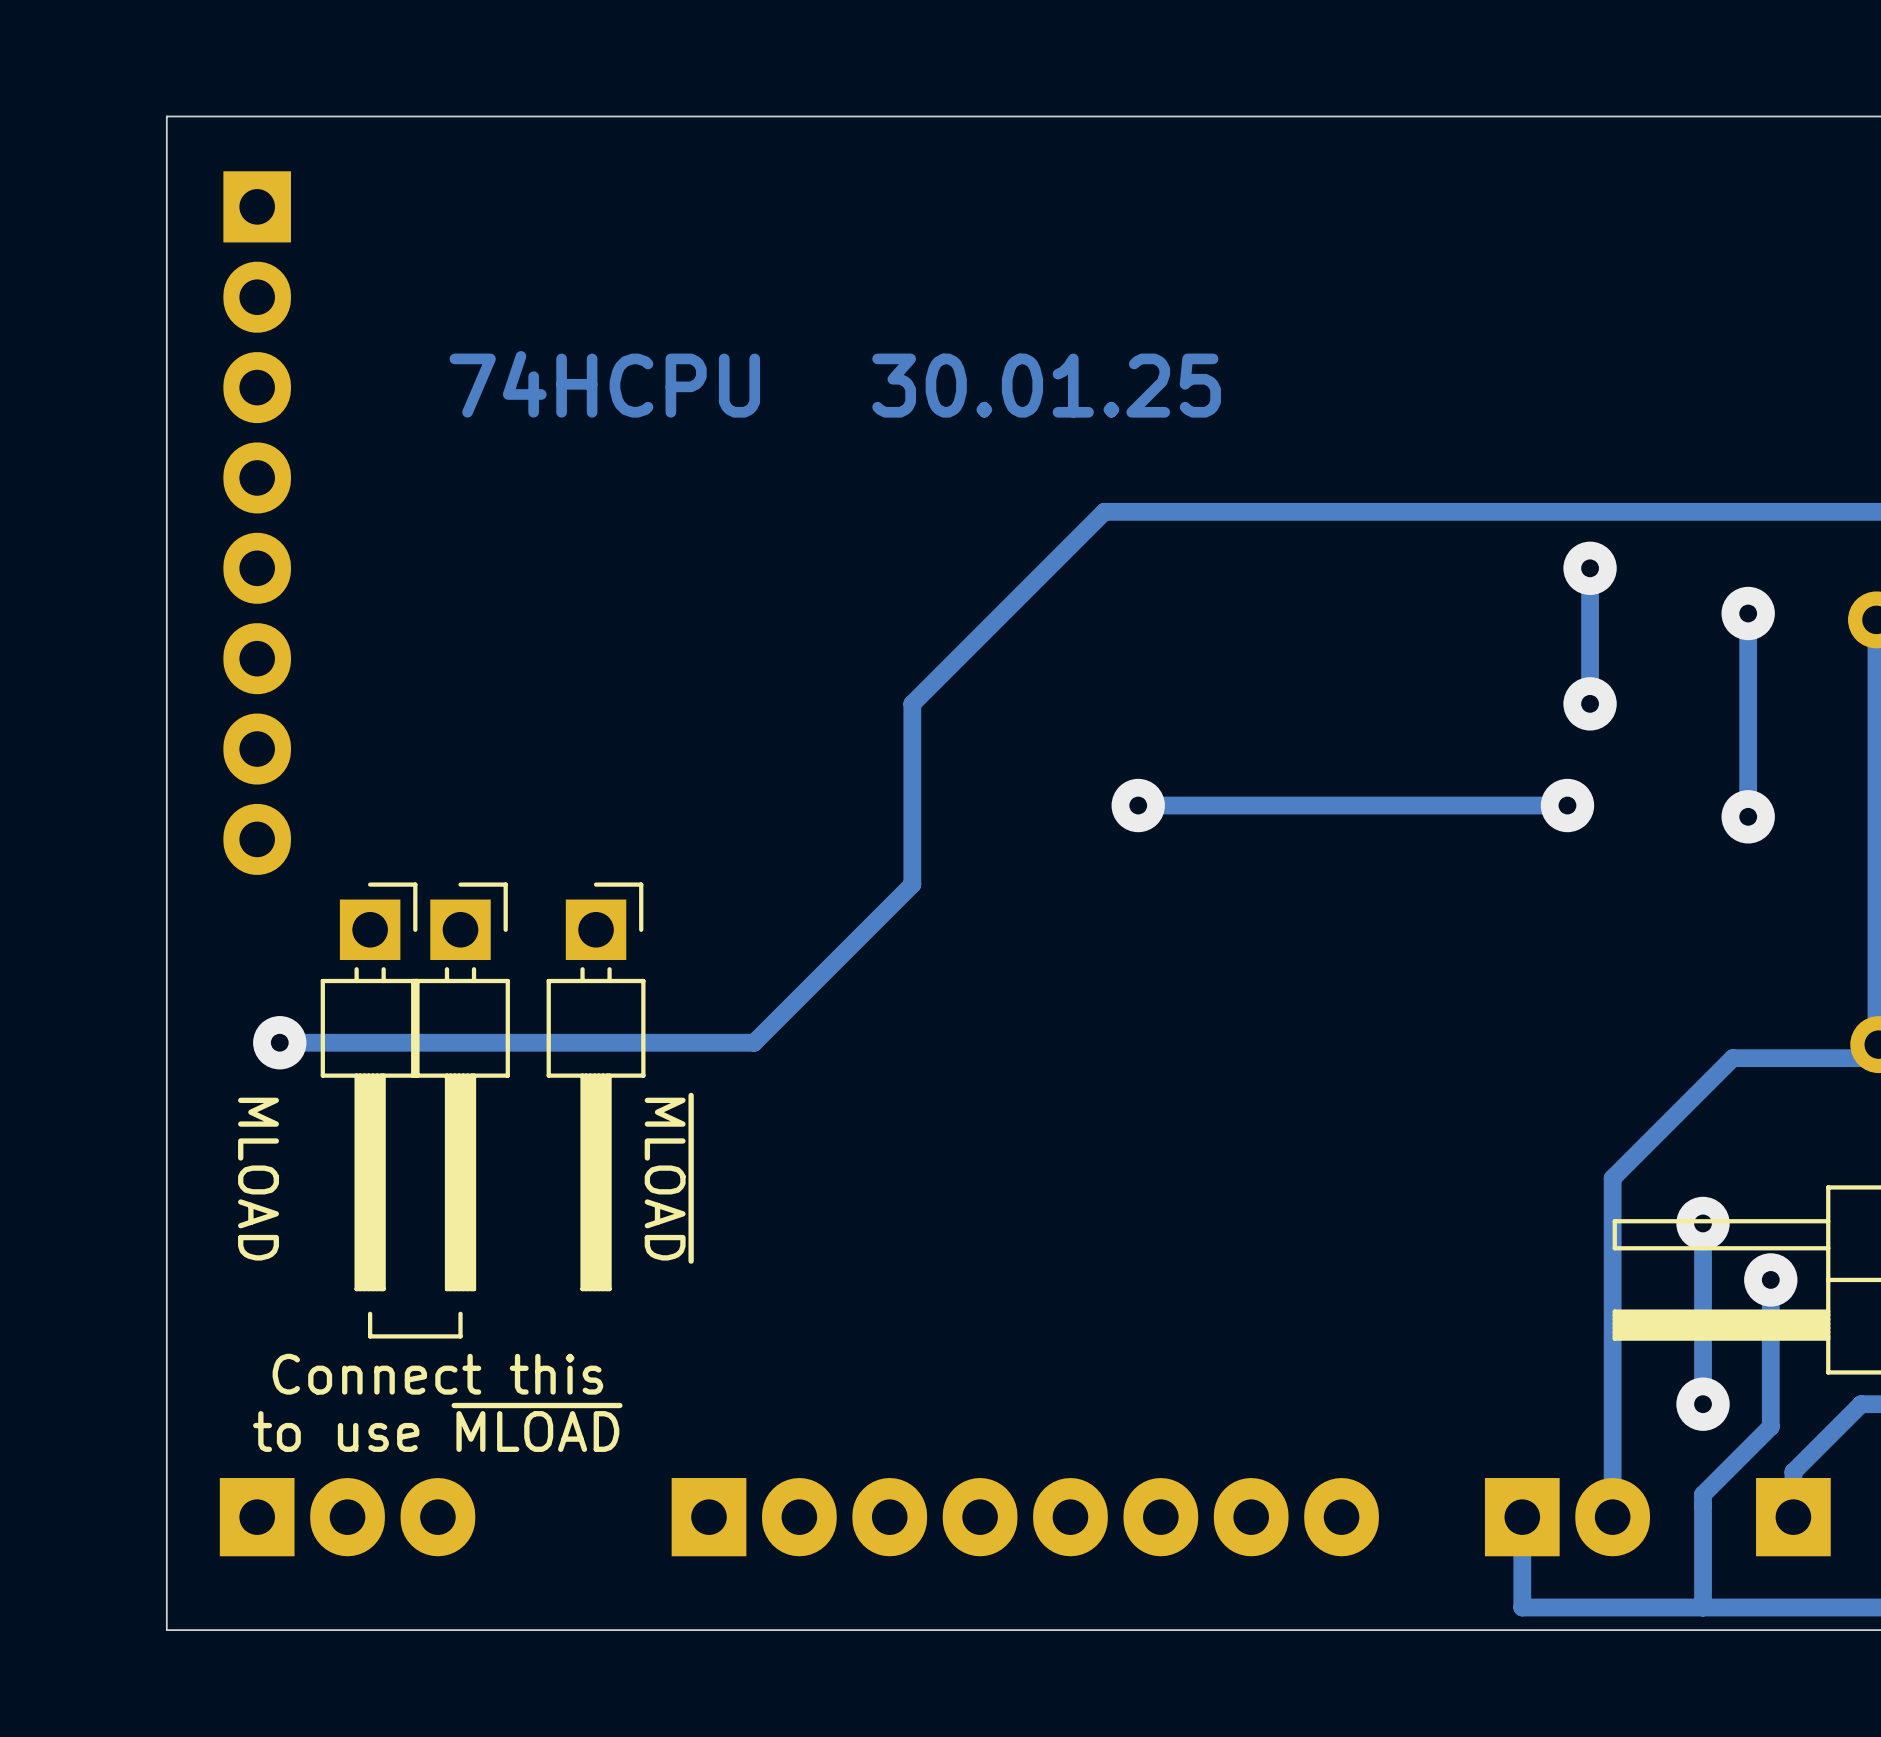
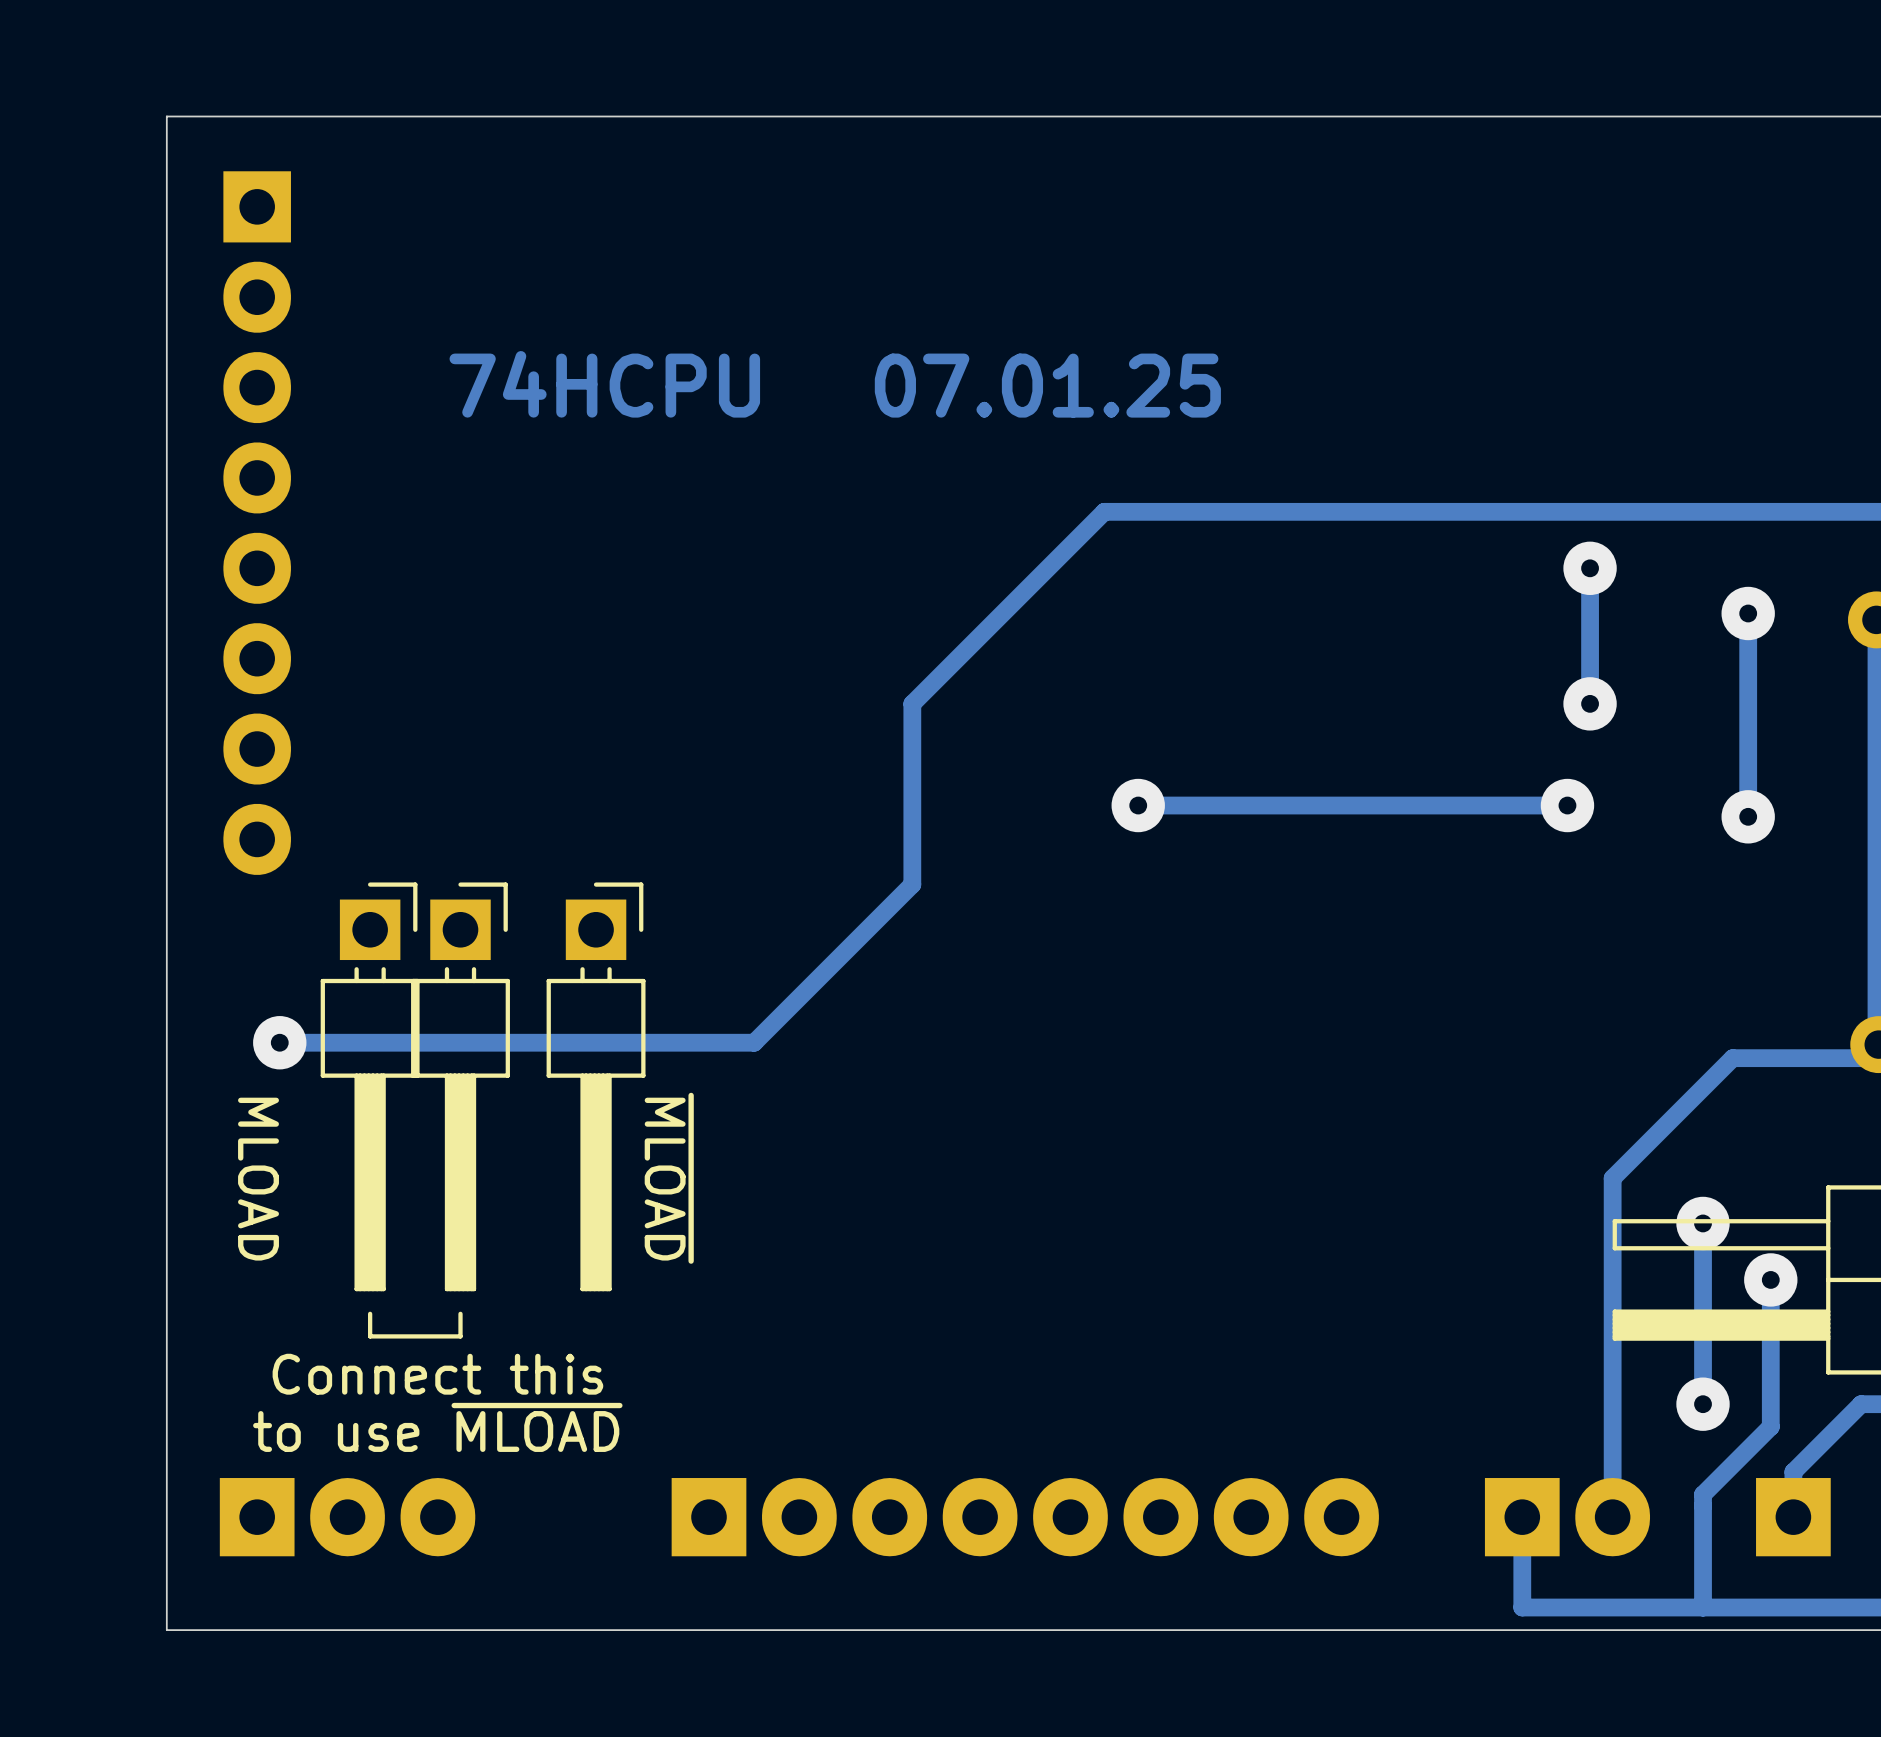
text: 30.01.25 (1046, 385) -> 07.01.25 (1047, 385)

